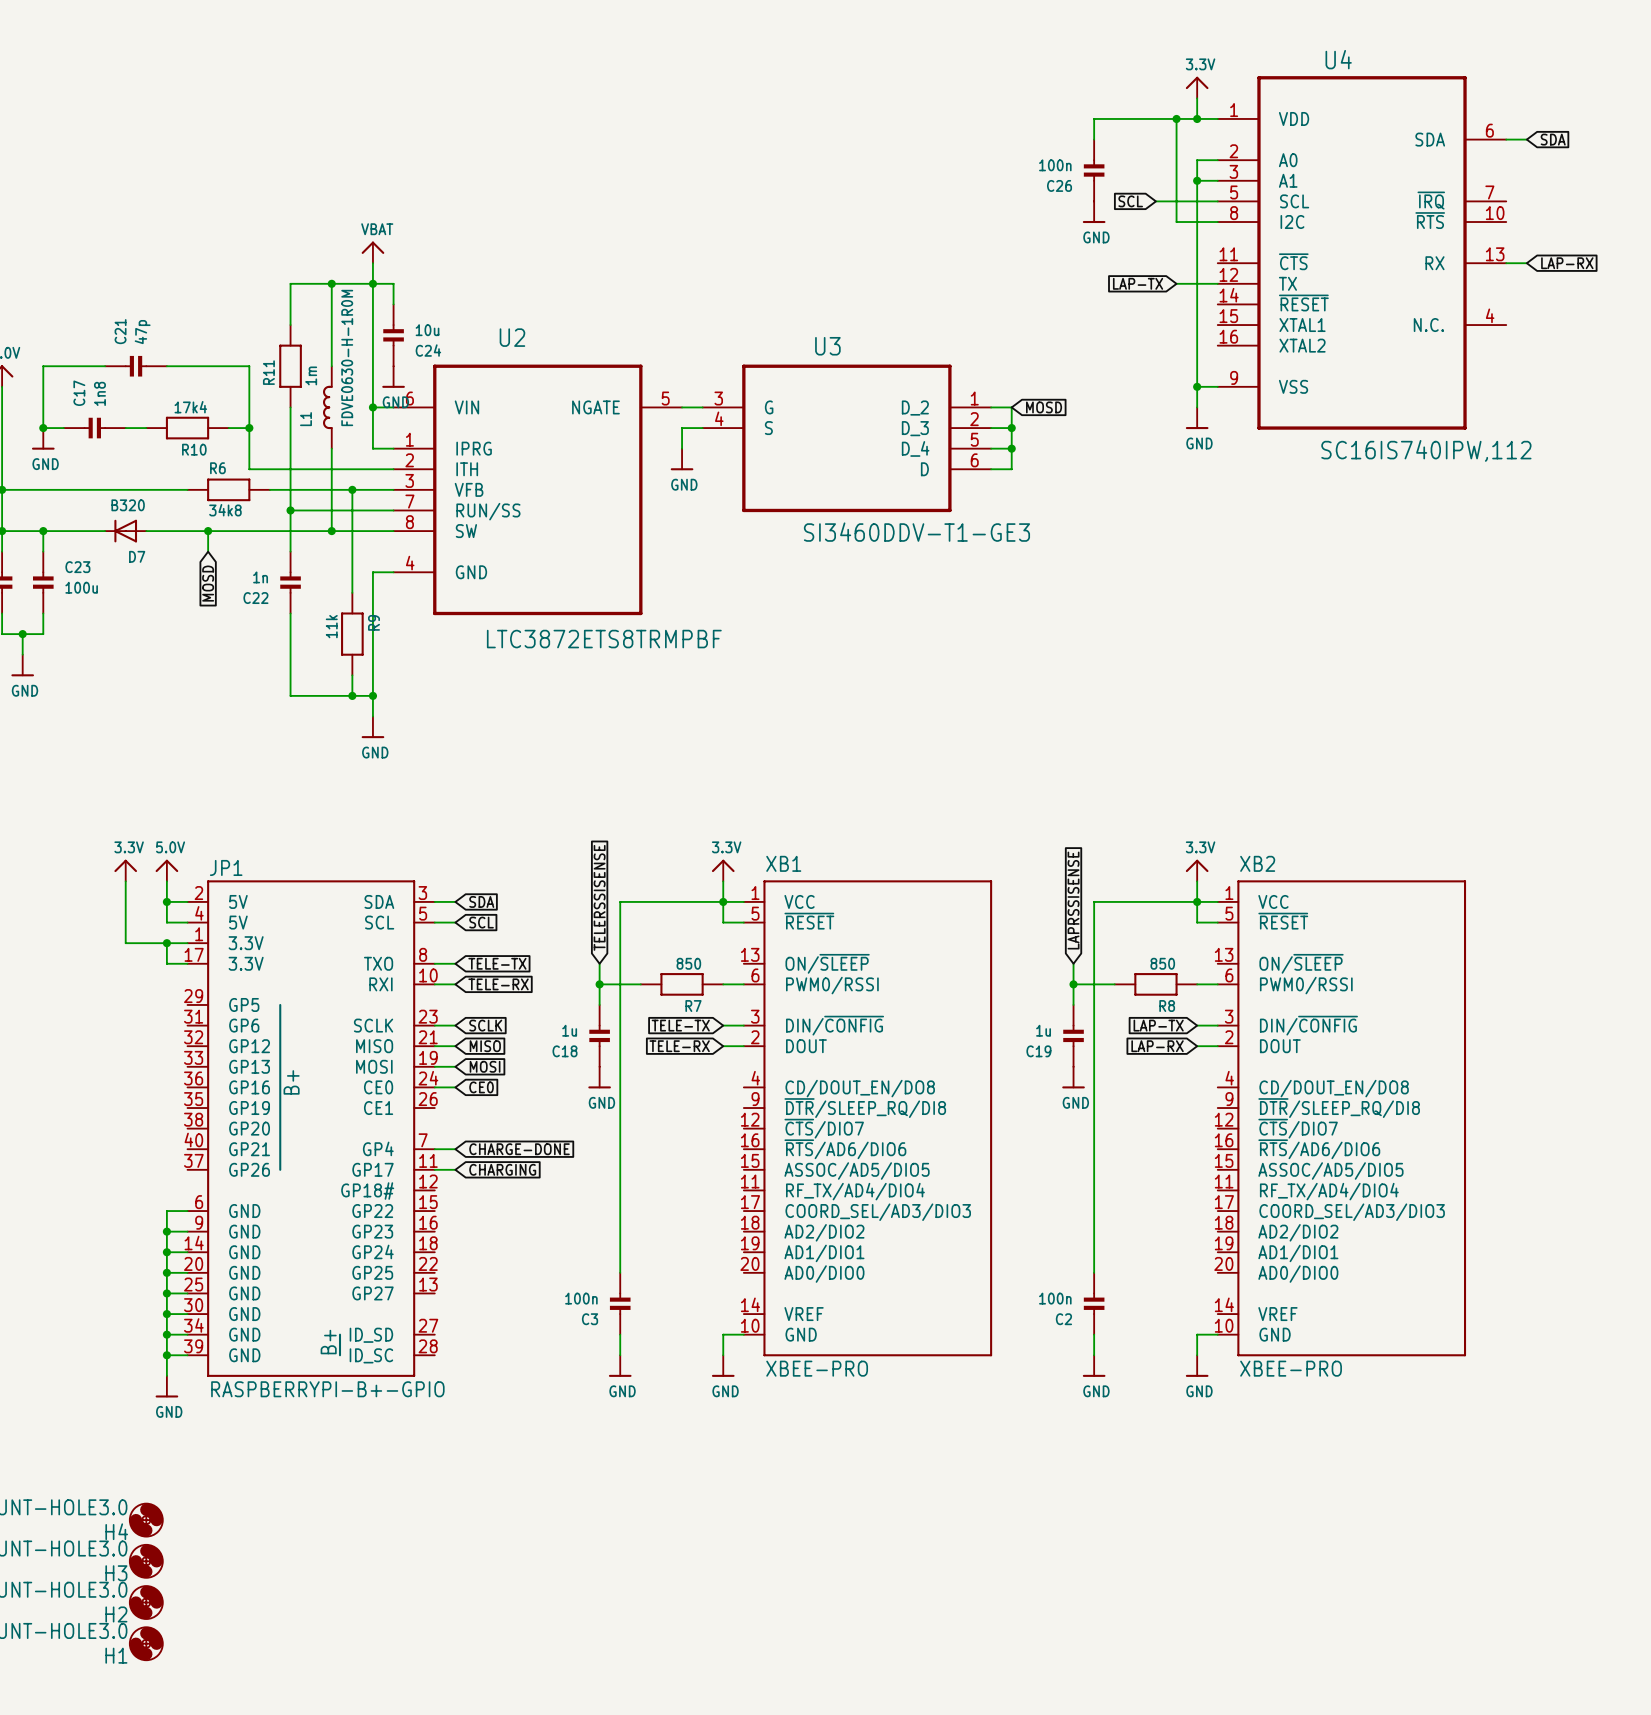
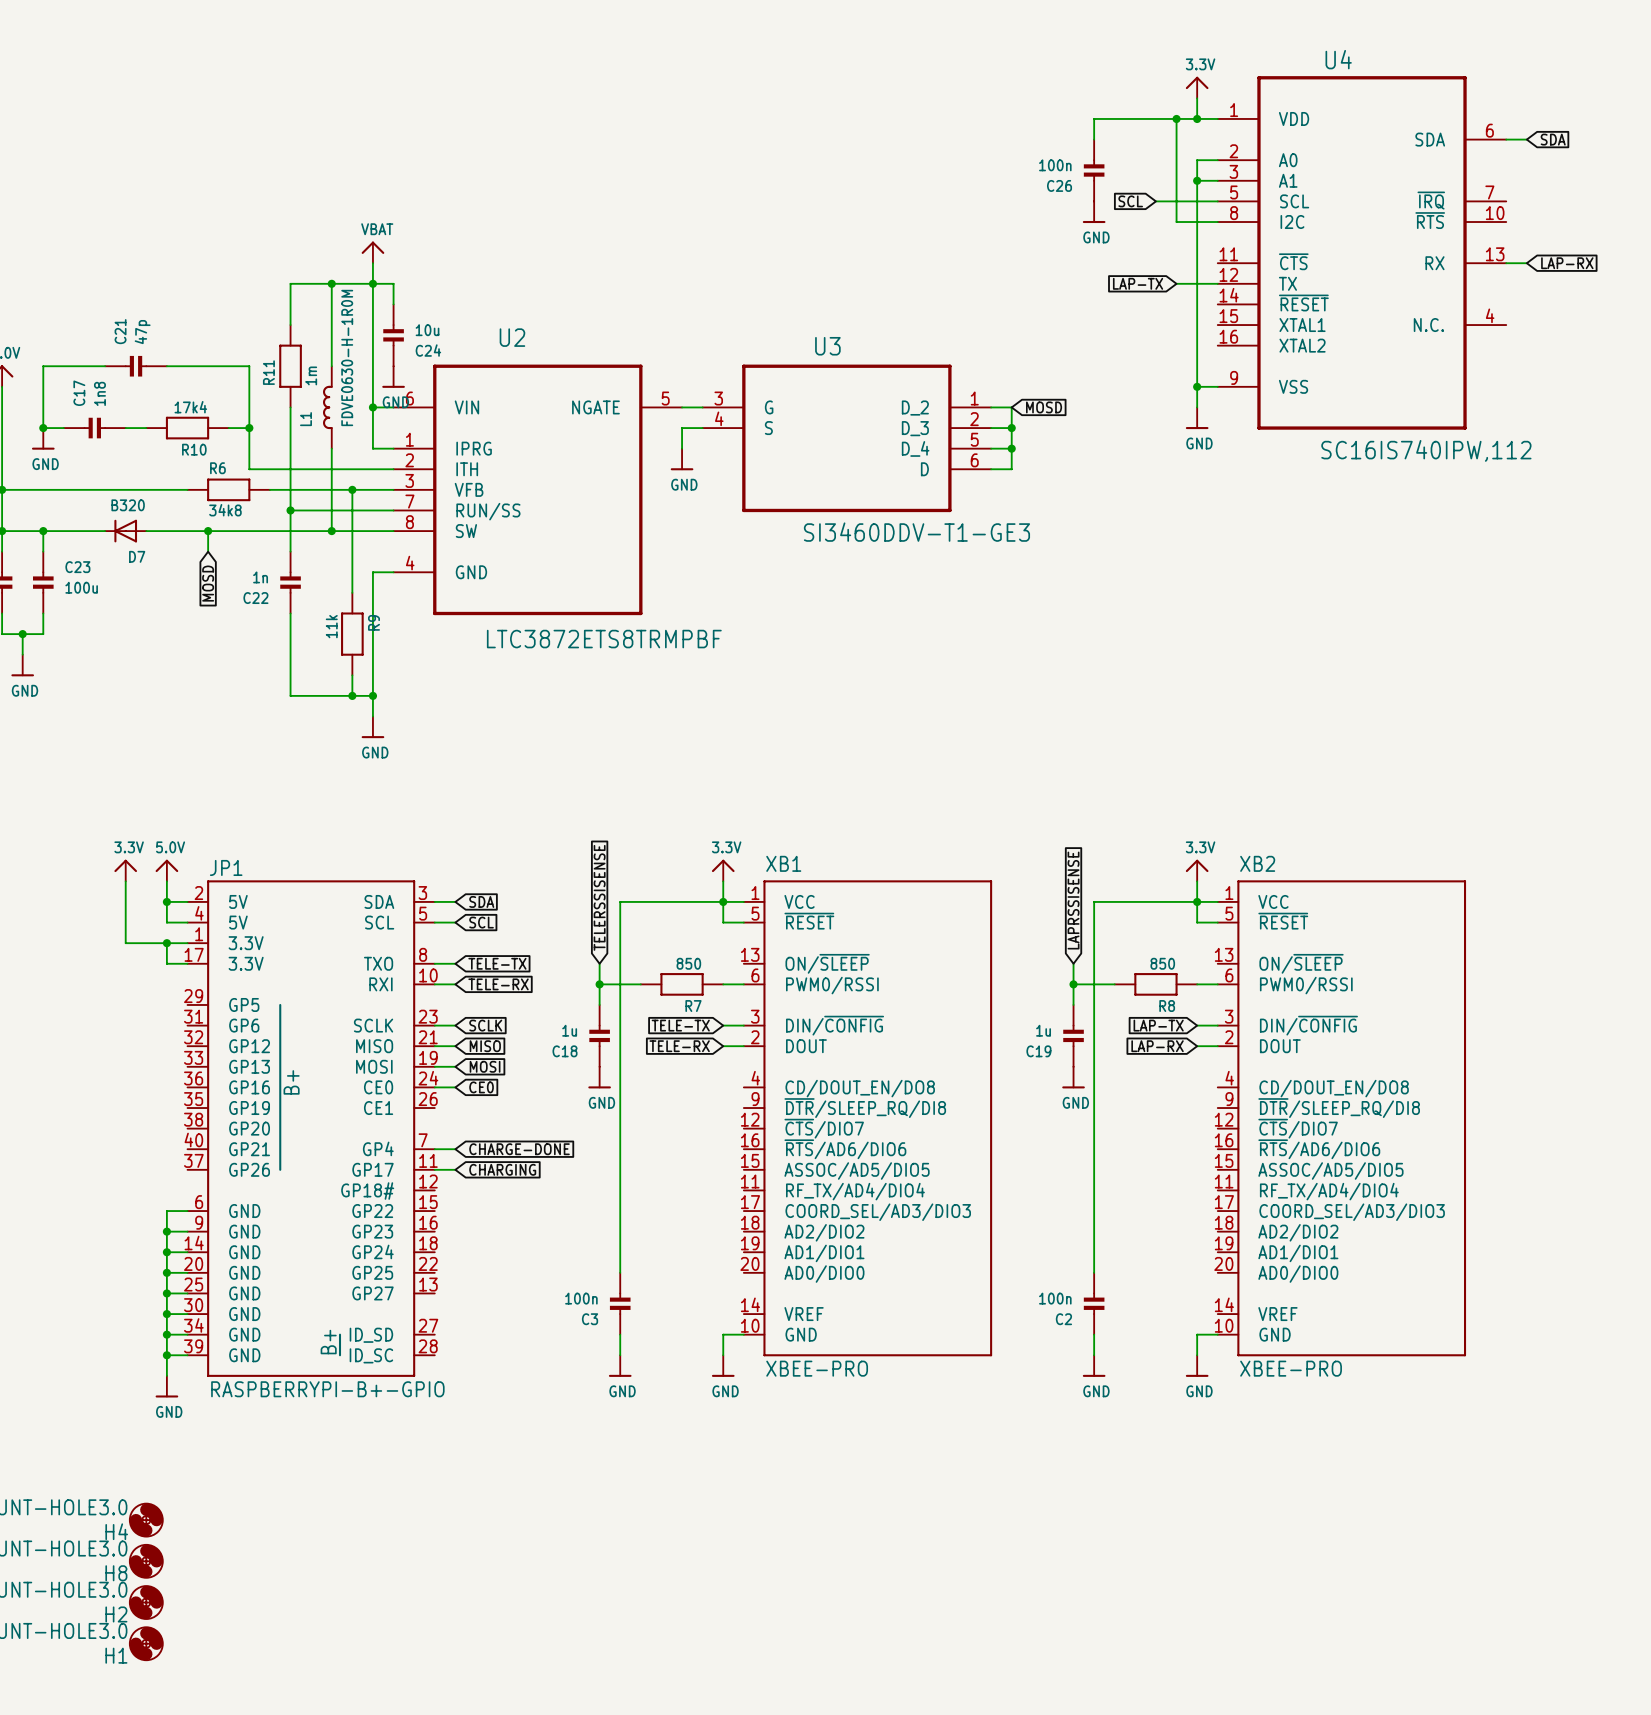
H3 name: H3 (116, 1573) -> H8 (116, 1573)

